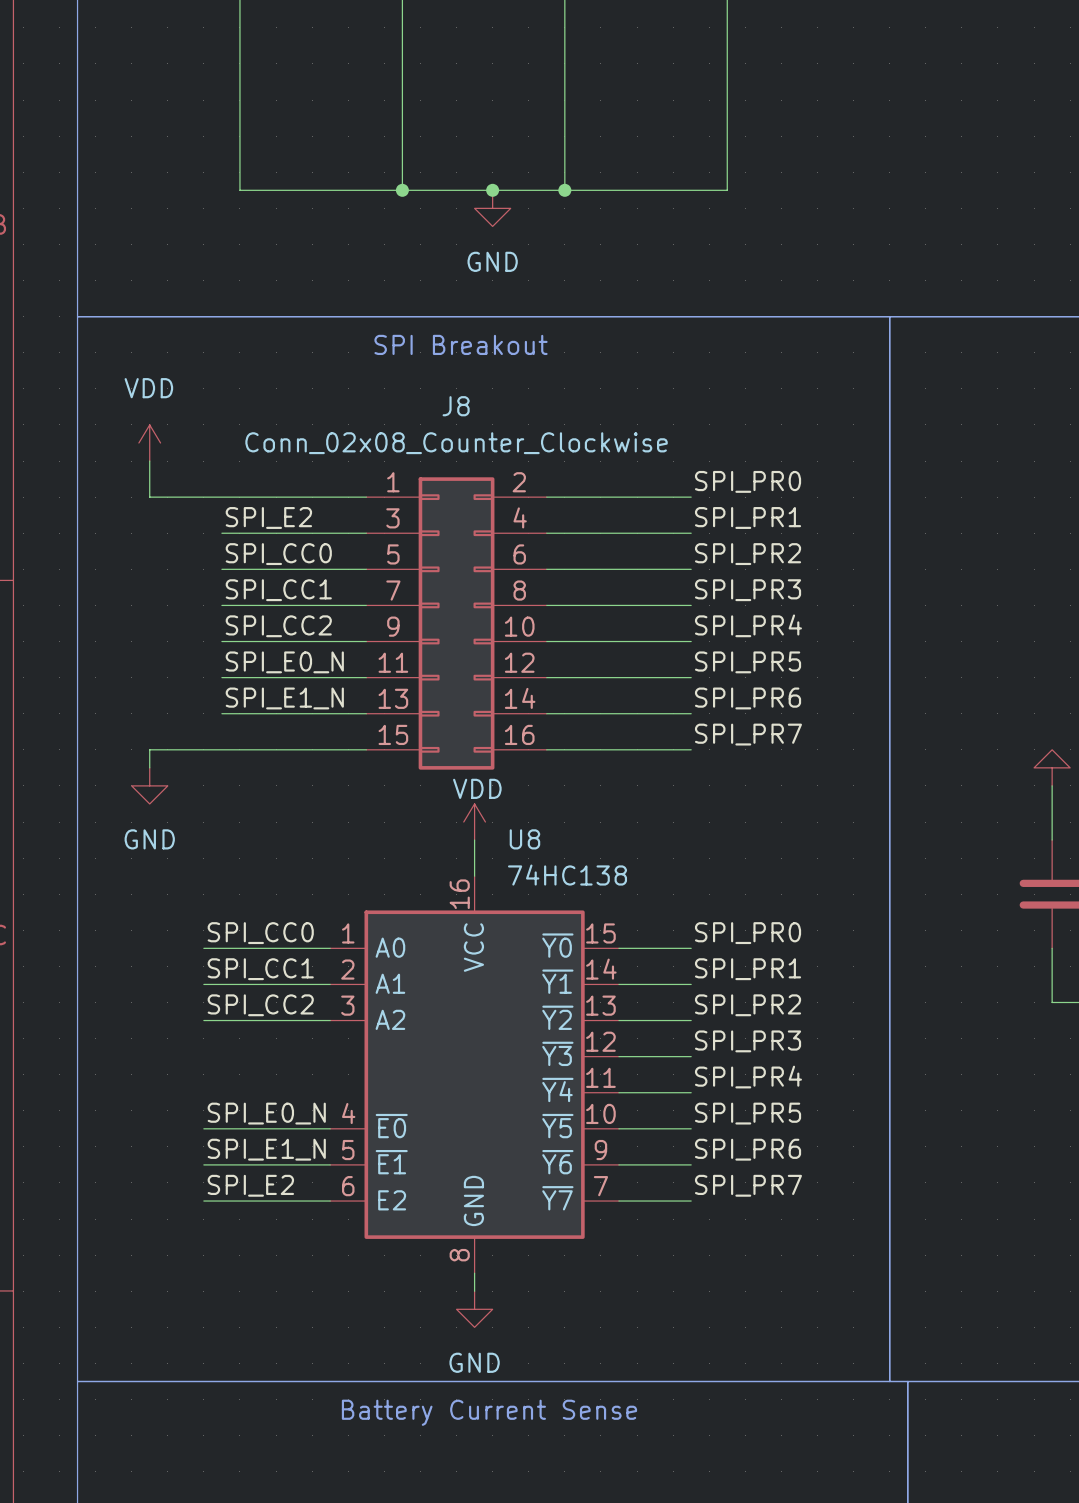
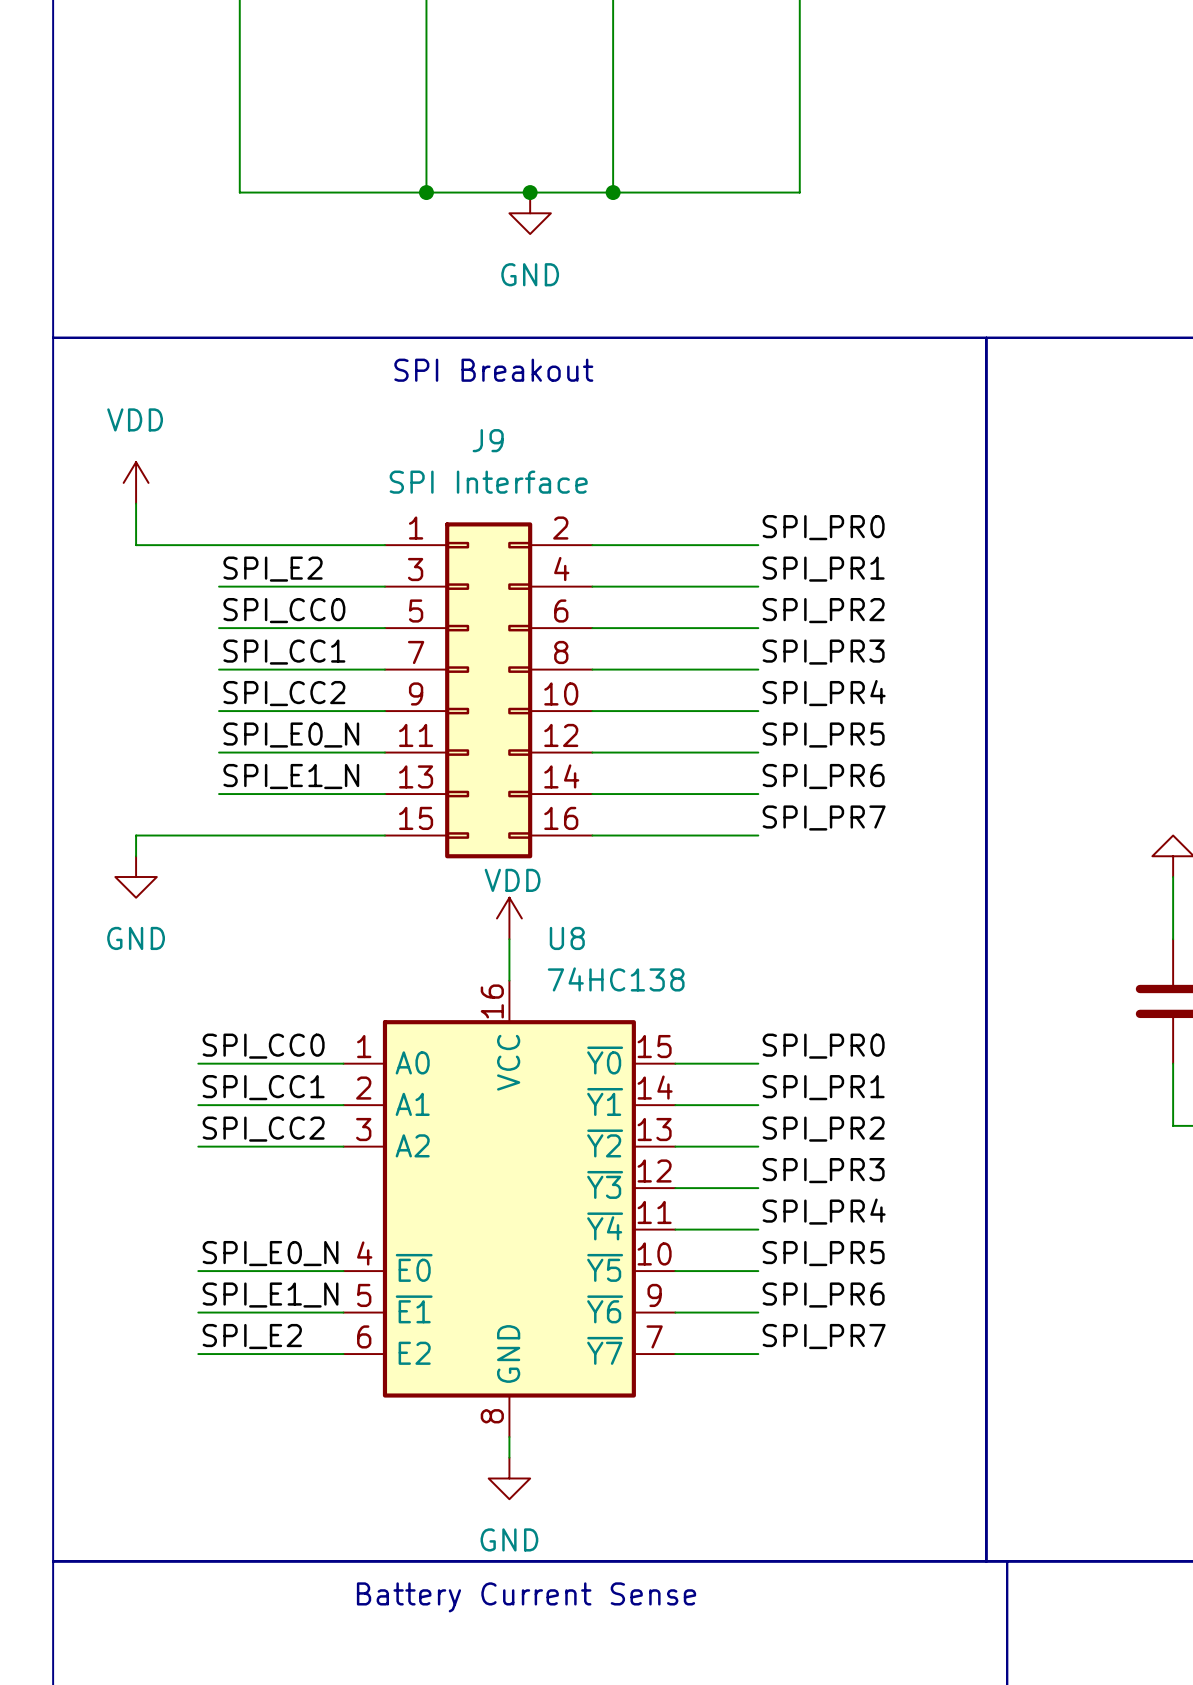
J8 name: J8 (456, 406) -> J9 (488, 440)
J8 value: Conn_02x08_Counter_Clockwise (456, 443) -> SPI Interface (488, 482)

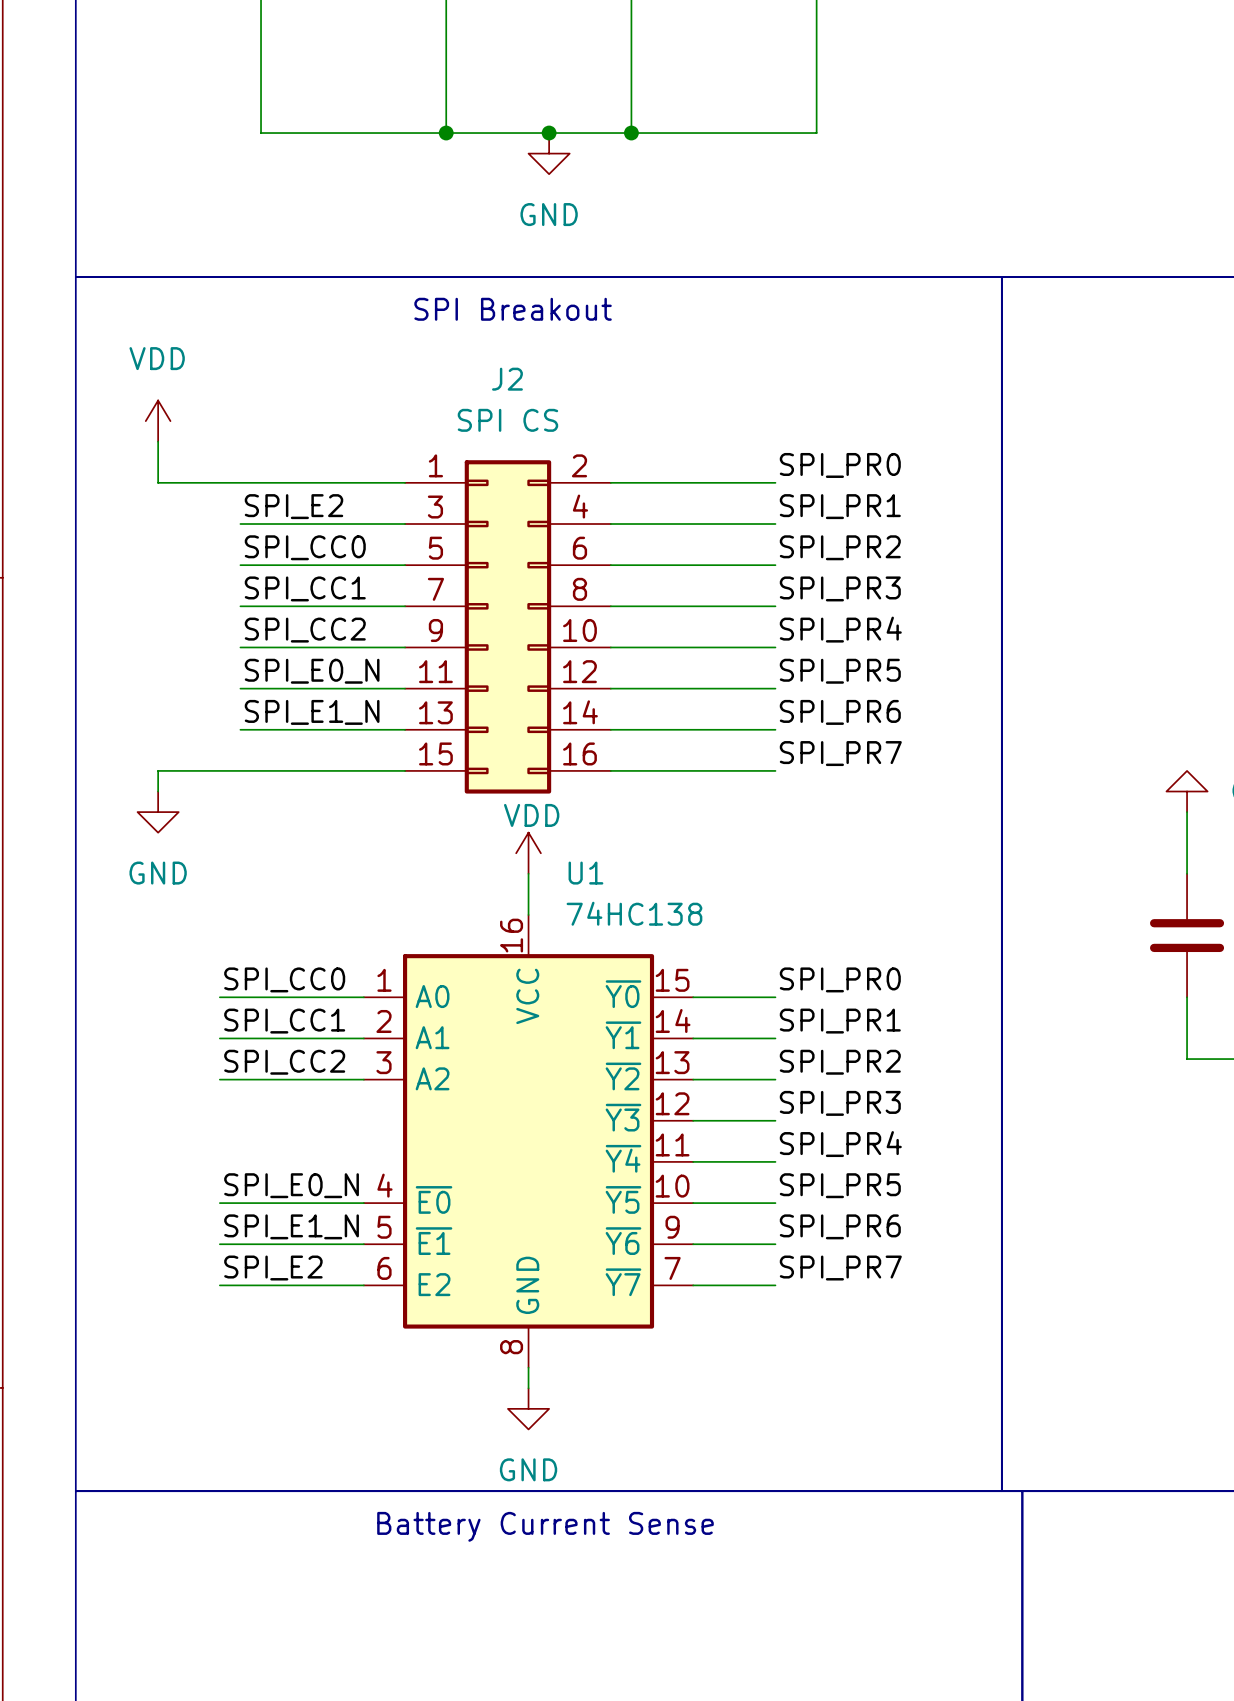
J9 name: J9 (488, 440) -> J2 (507, 379)
J9 value: SPI Interface (488, 482) -> SPI CS (507, 420)
U8 name: U8 (567, 938) -> U1 (585, 873)

